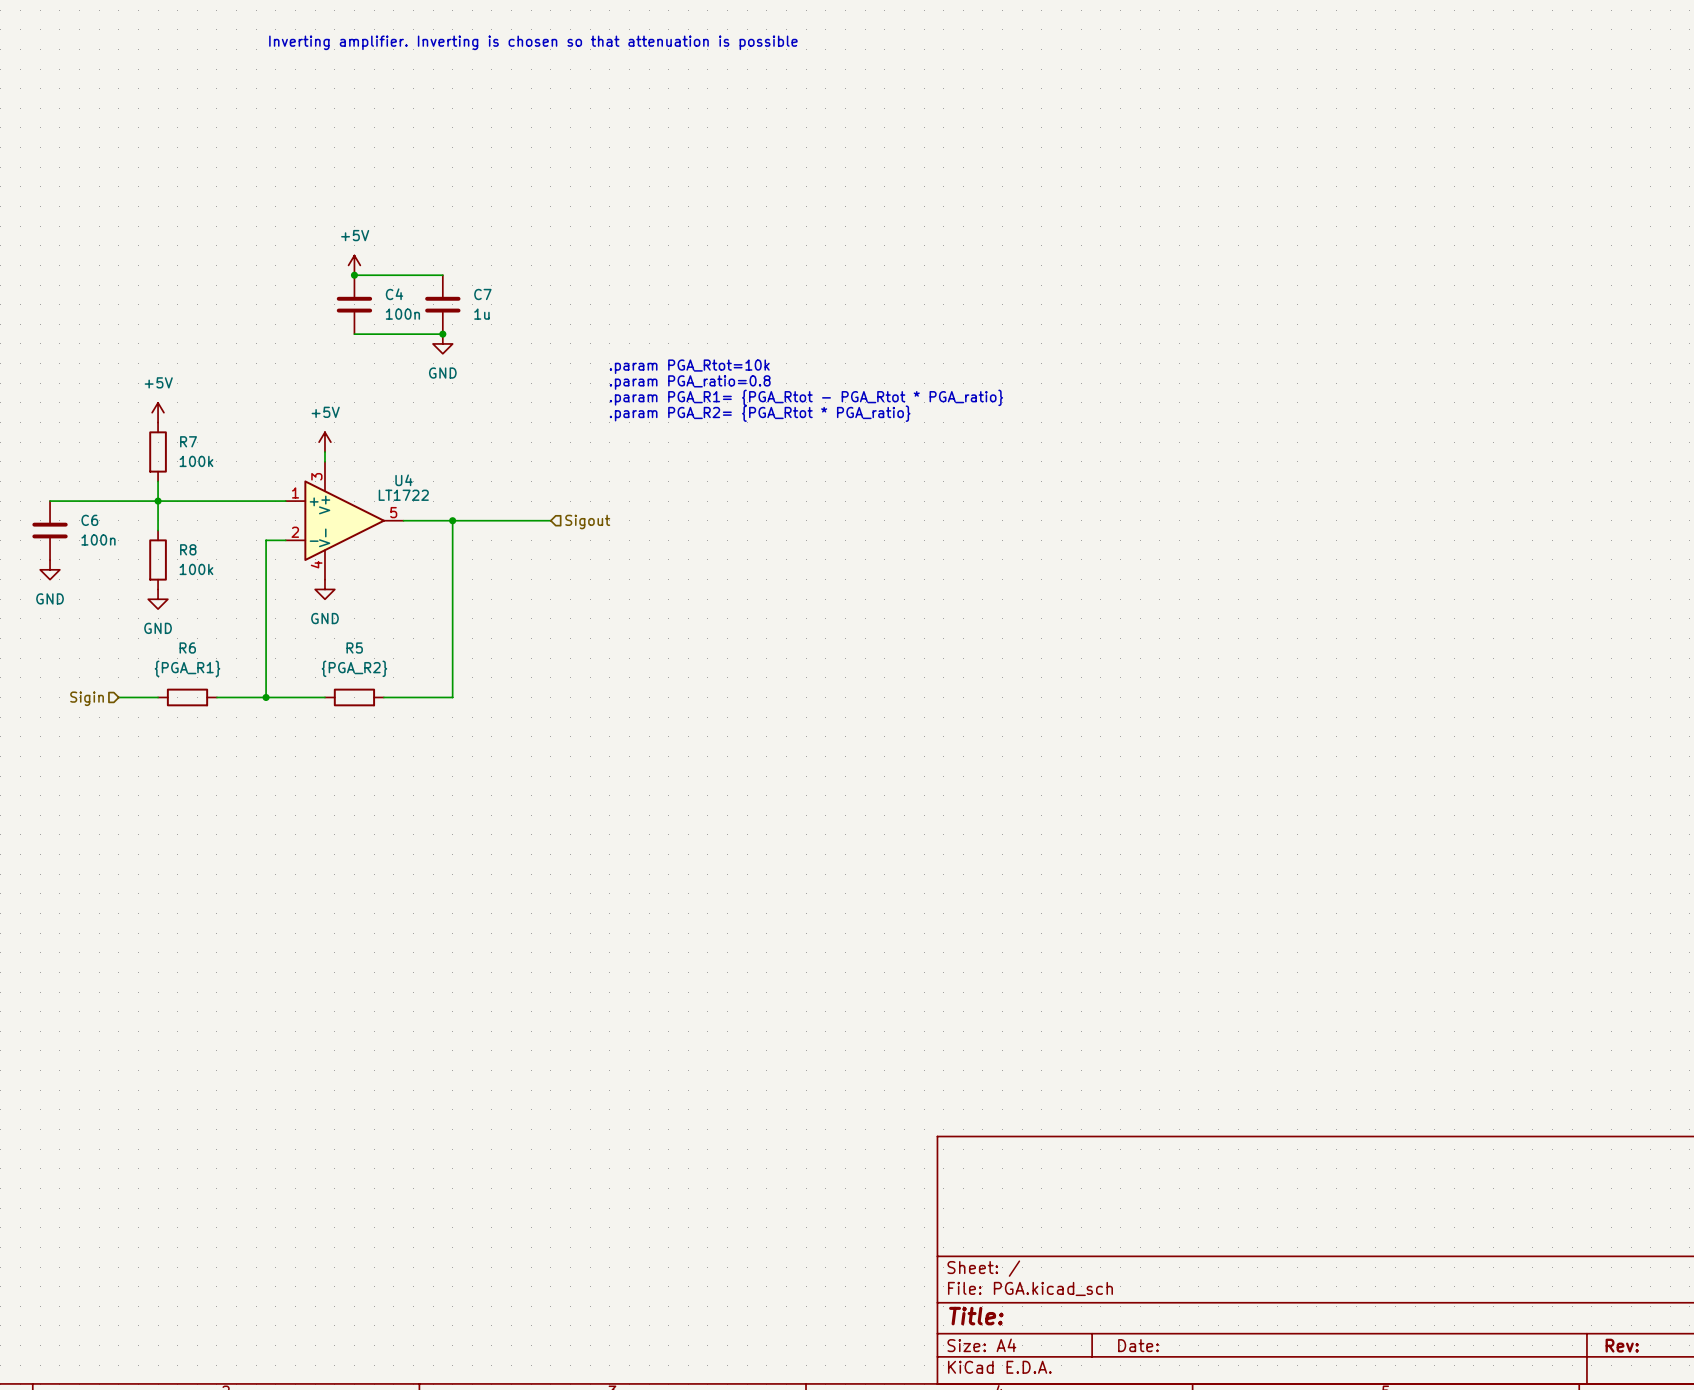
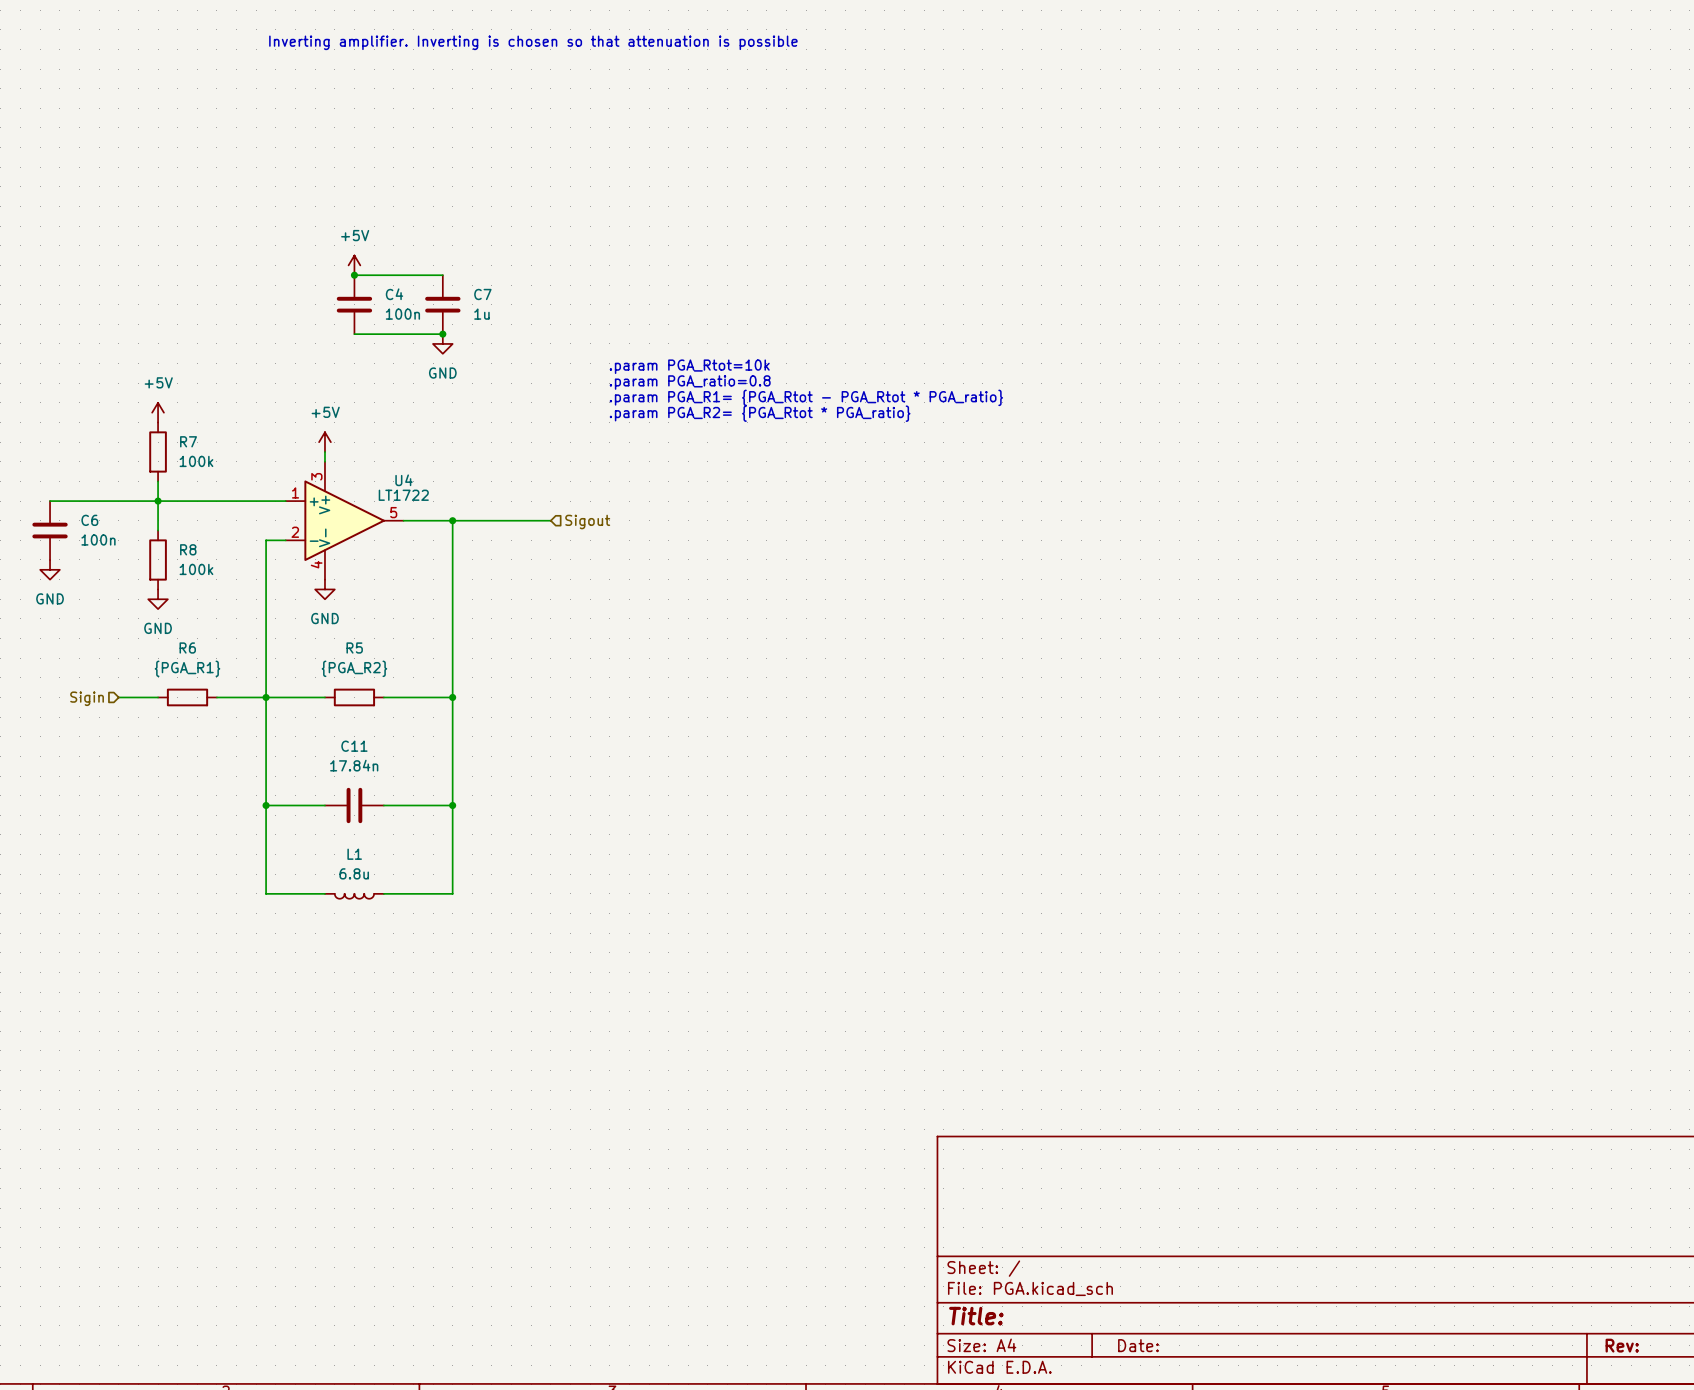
wire: none -> (266, 697) (266, 893) (324, 893)
wire: none -> (452, 697) (452, 893) (383, 893)
junction: none -> (452, 697)
wire: none -> (266, 805) (324, 805)
junction: none -> (266, 805)
C11: none -> 17.84n (354, 805)
wire: none -> (383, 805) (452, 805)
junction: none -> (452, 805)
L1: none -> 6.8u (354, 896)

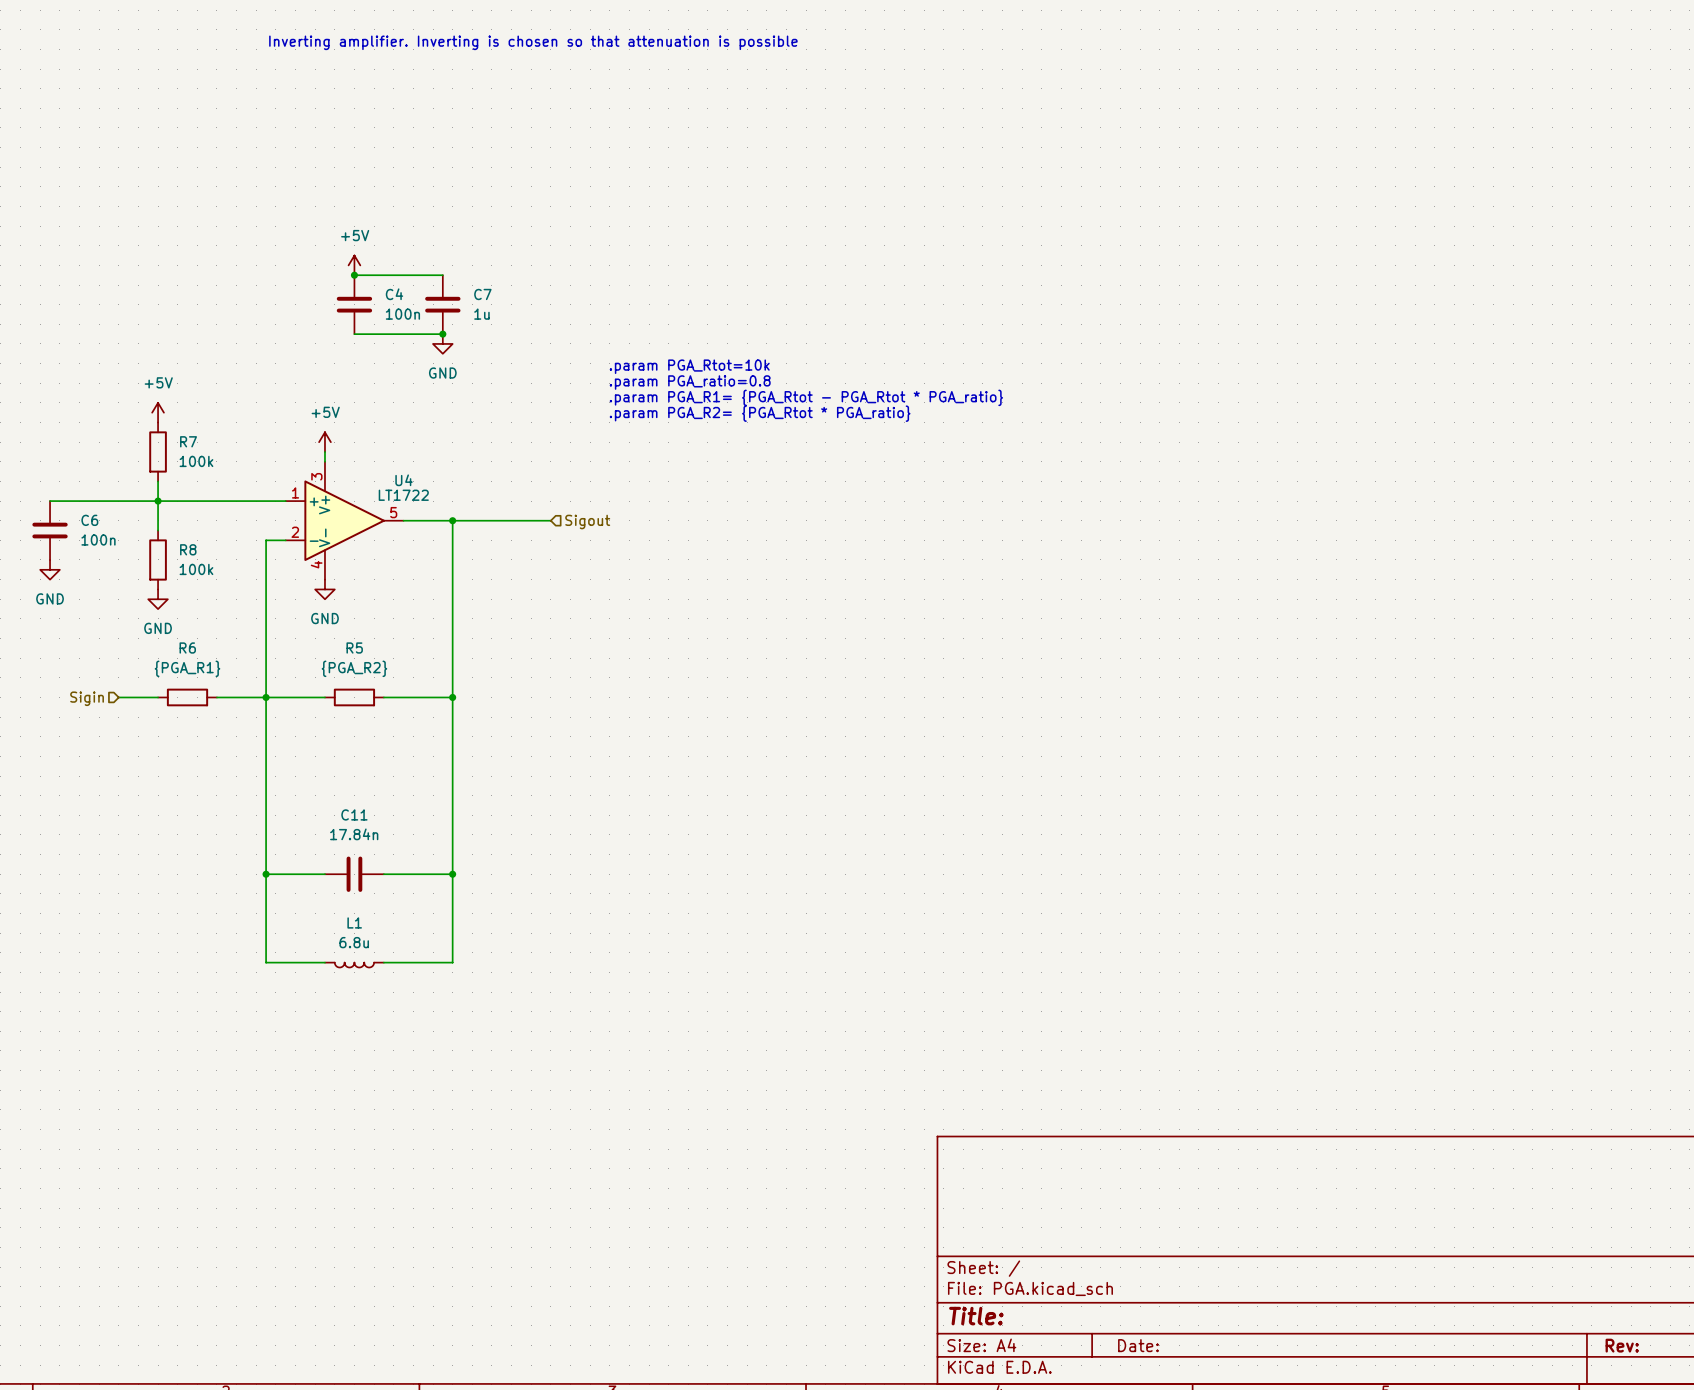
wire: (266, 805) (324, 805) -> (266, 874) (324, 874)
junction: (266, 805) -> none
C11 position: (354, 805) -> (354, 874)
wire: (383, 805) (452, 805) -> (383, 874) (452, 874)
junction: (452, 805) -> none
junction: none -> (266, 874)
junction: none -> (452, 874)
wire: (266, 893) (324, 893) -> (266, 893) (266, 962) (324, 962)
wire: (383, 893) (452, 893) -> (383, 962) (452, 962) (452, 893)
L1 position: (354, 896) -> (354, 965)

